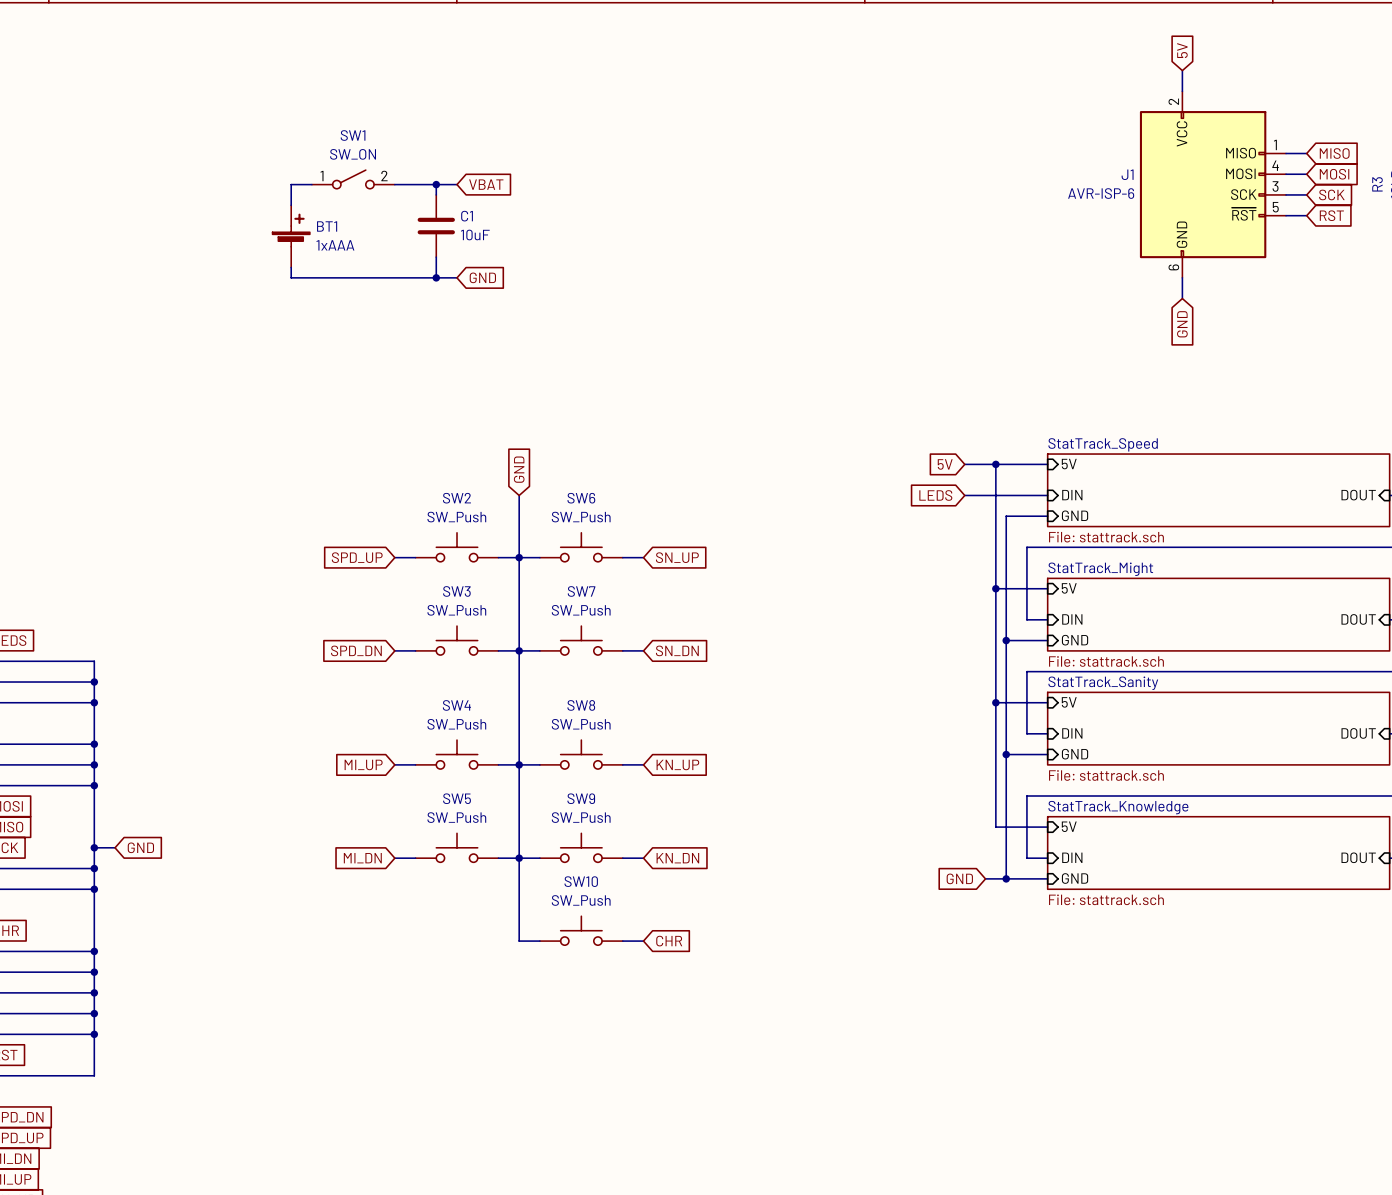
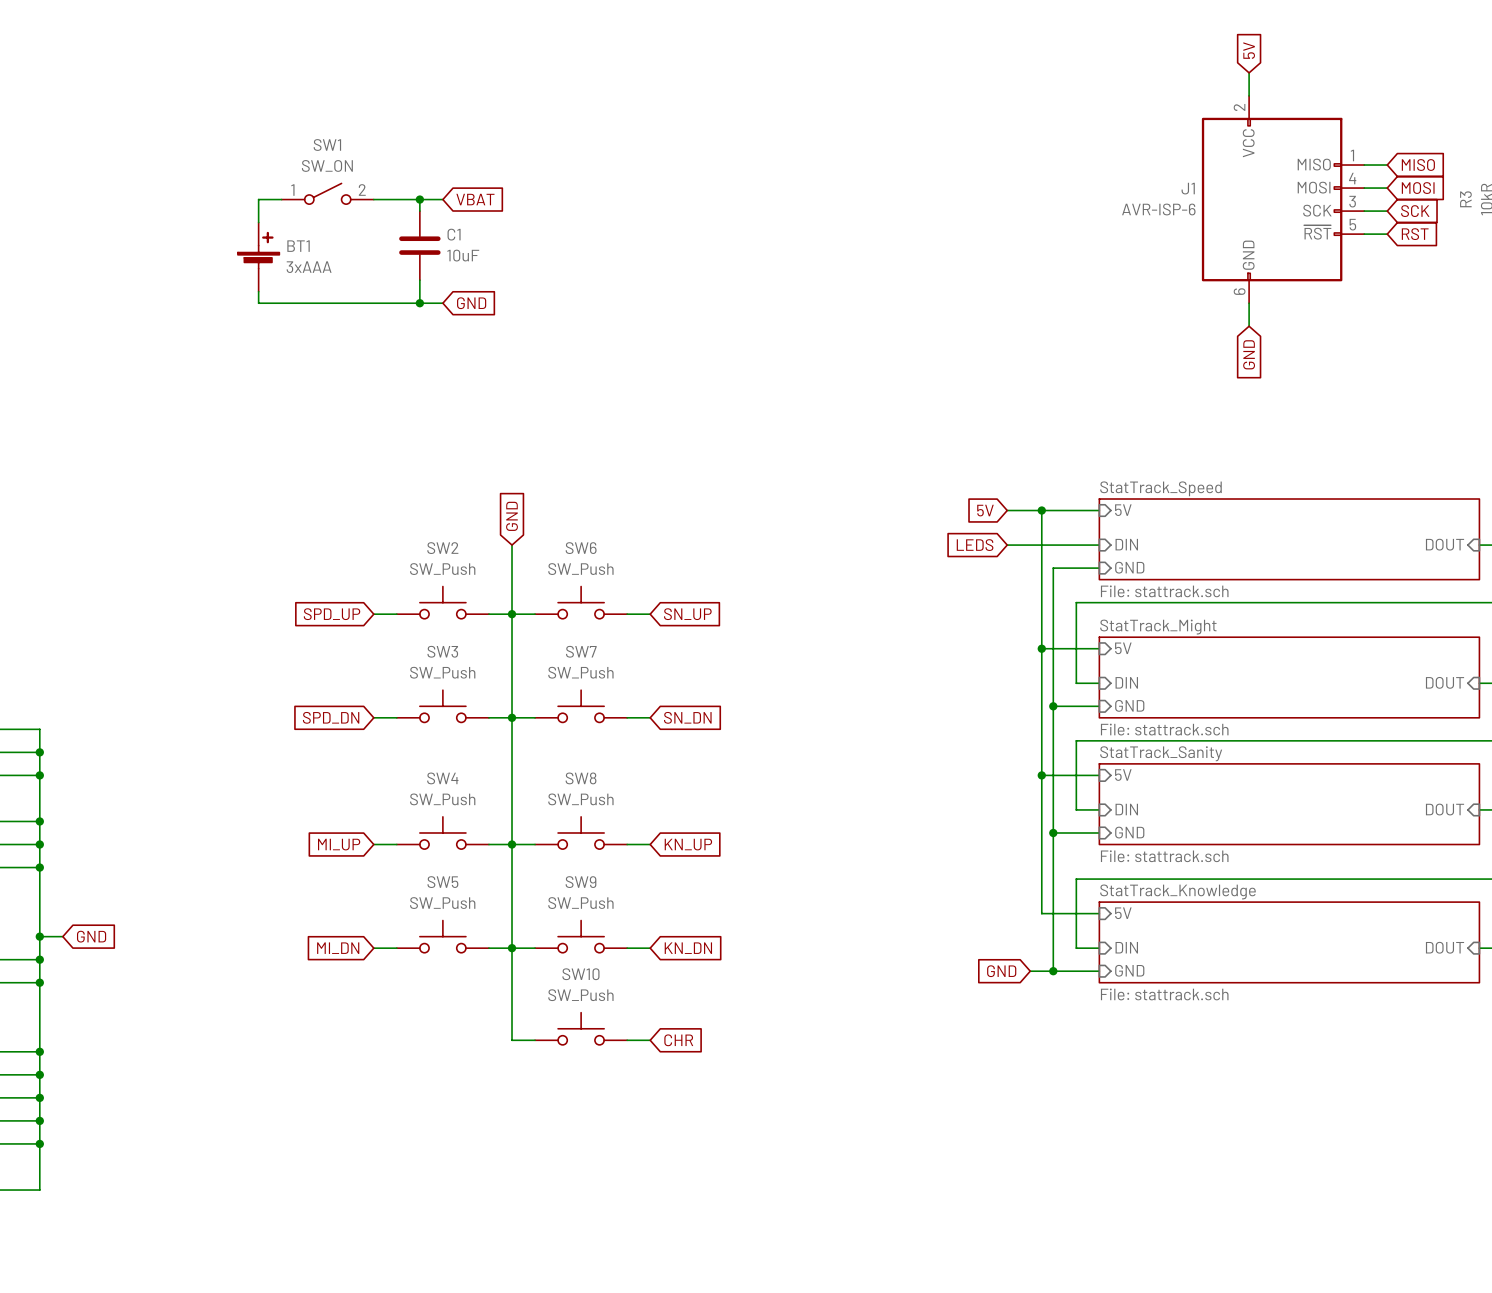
BT1 value: 1xAAA (335, 245) -> 3xAAA (309, 267)

